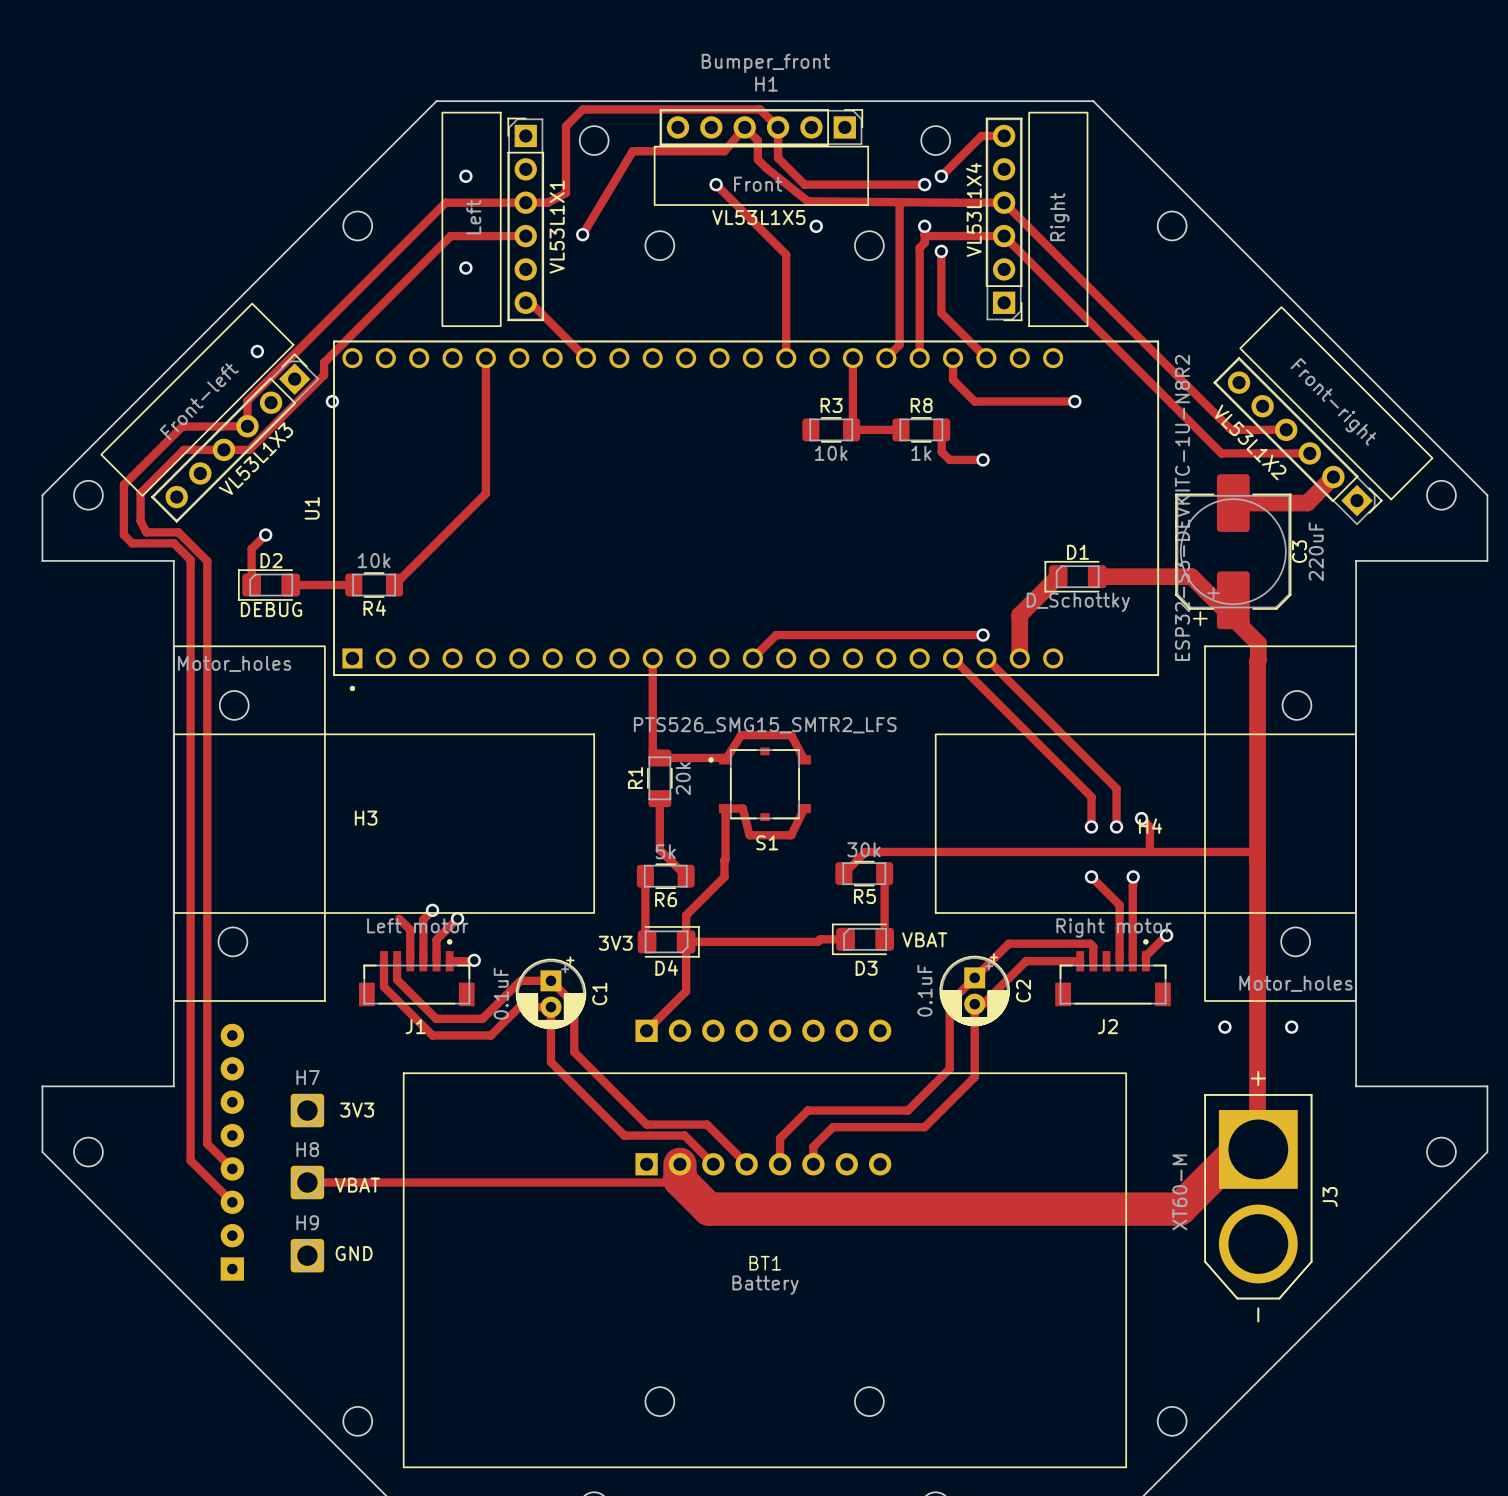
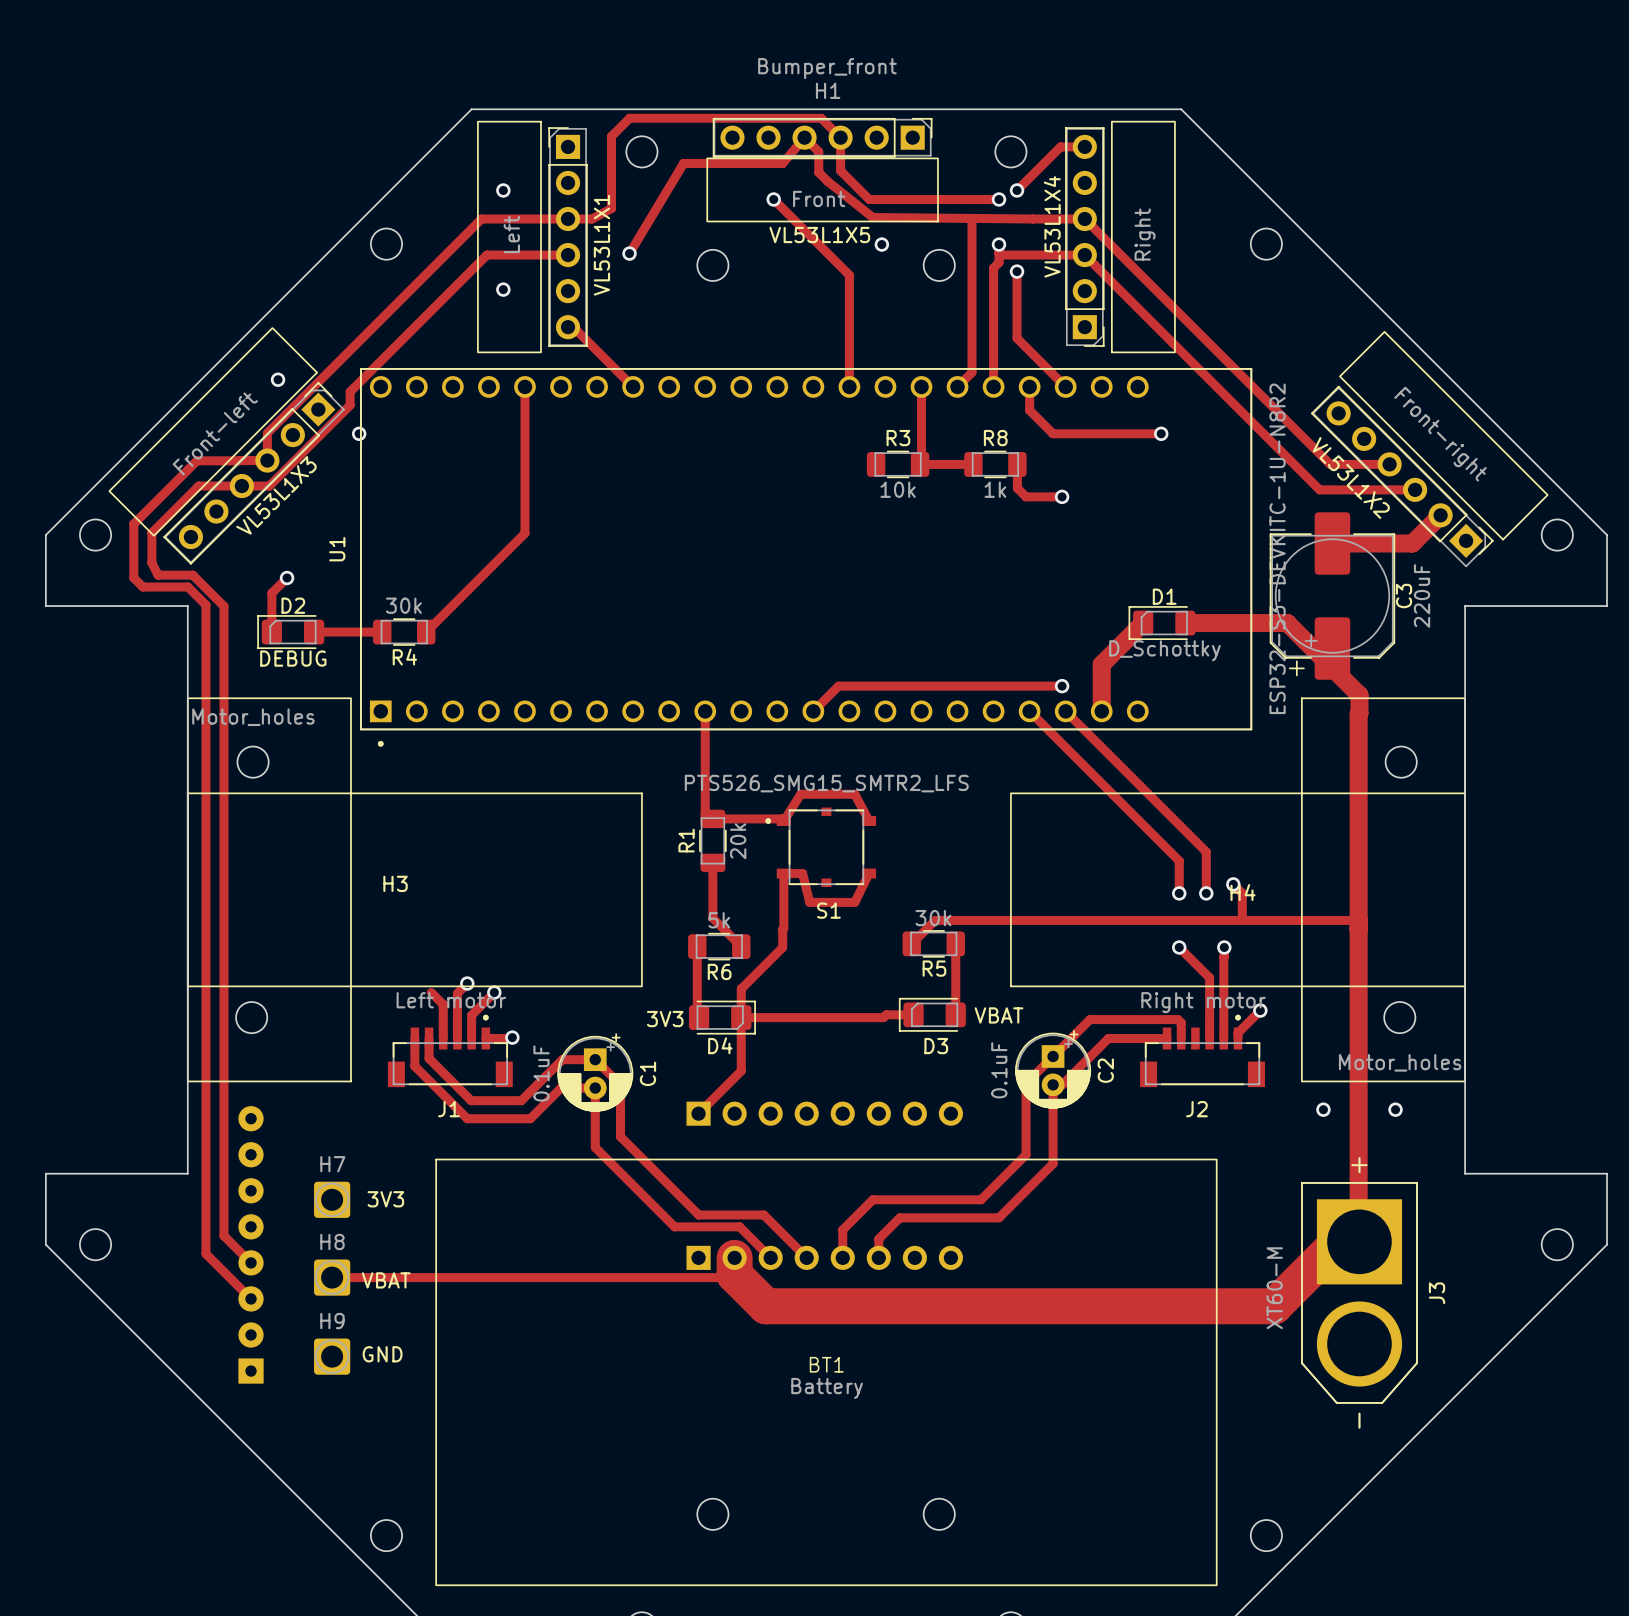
R4 value: 10k (374, 560) -> 30k (403, 605)

